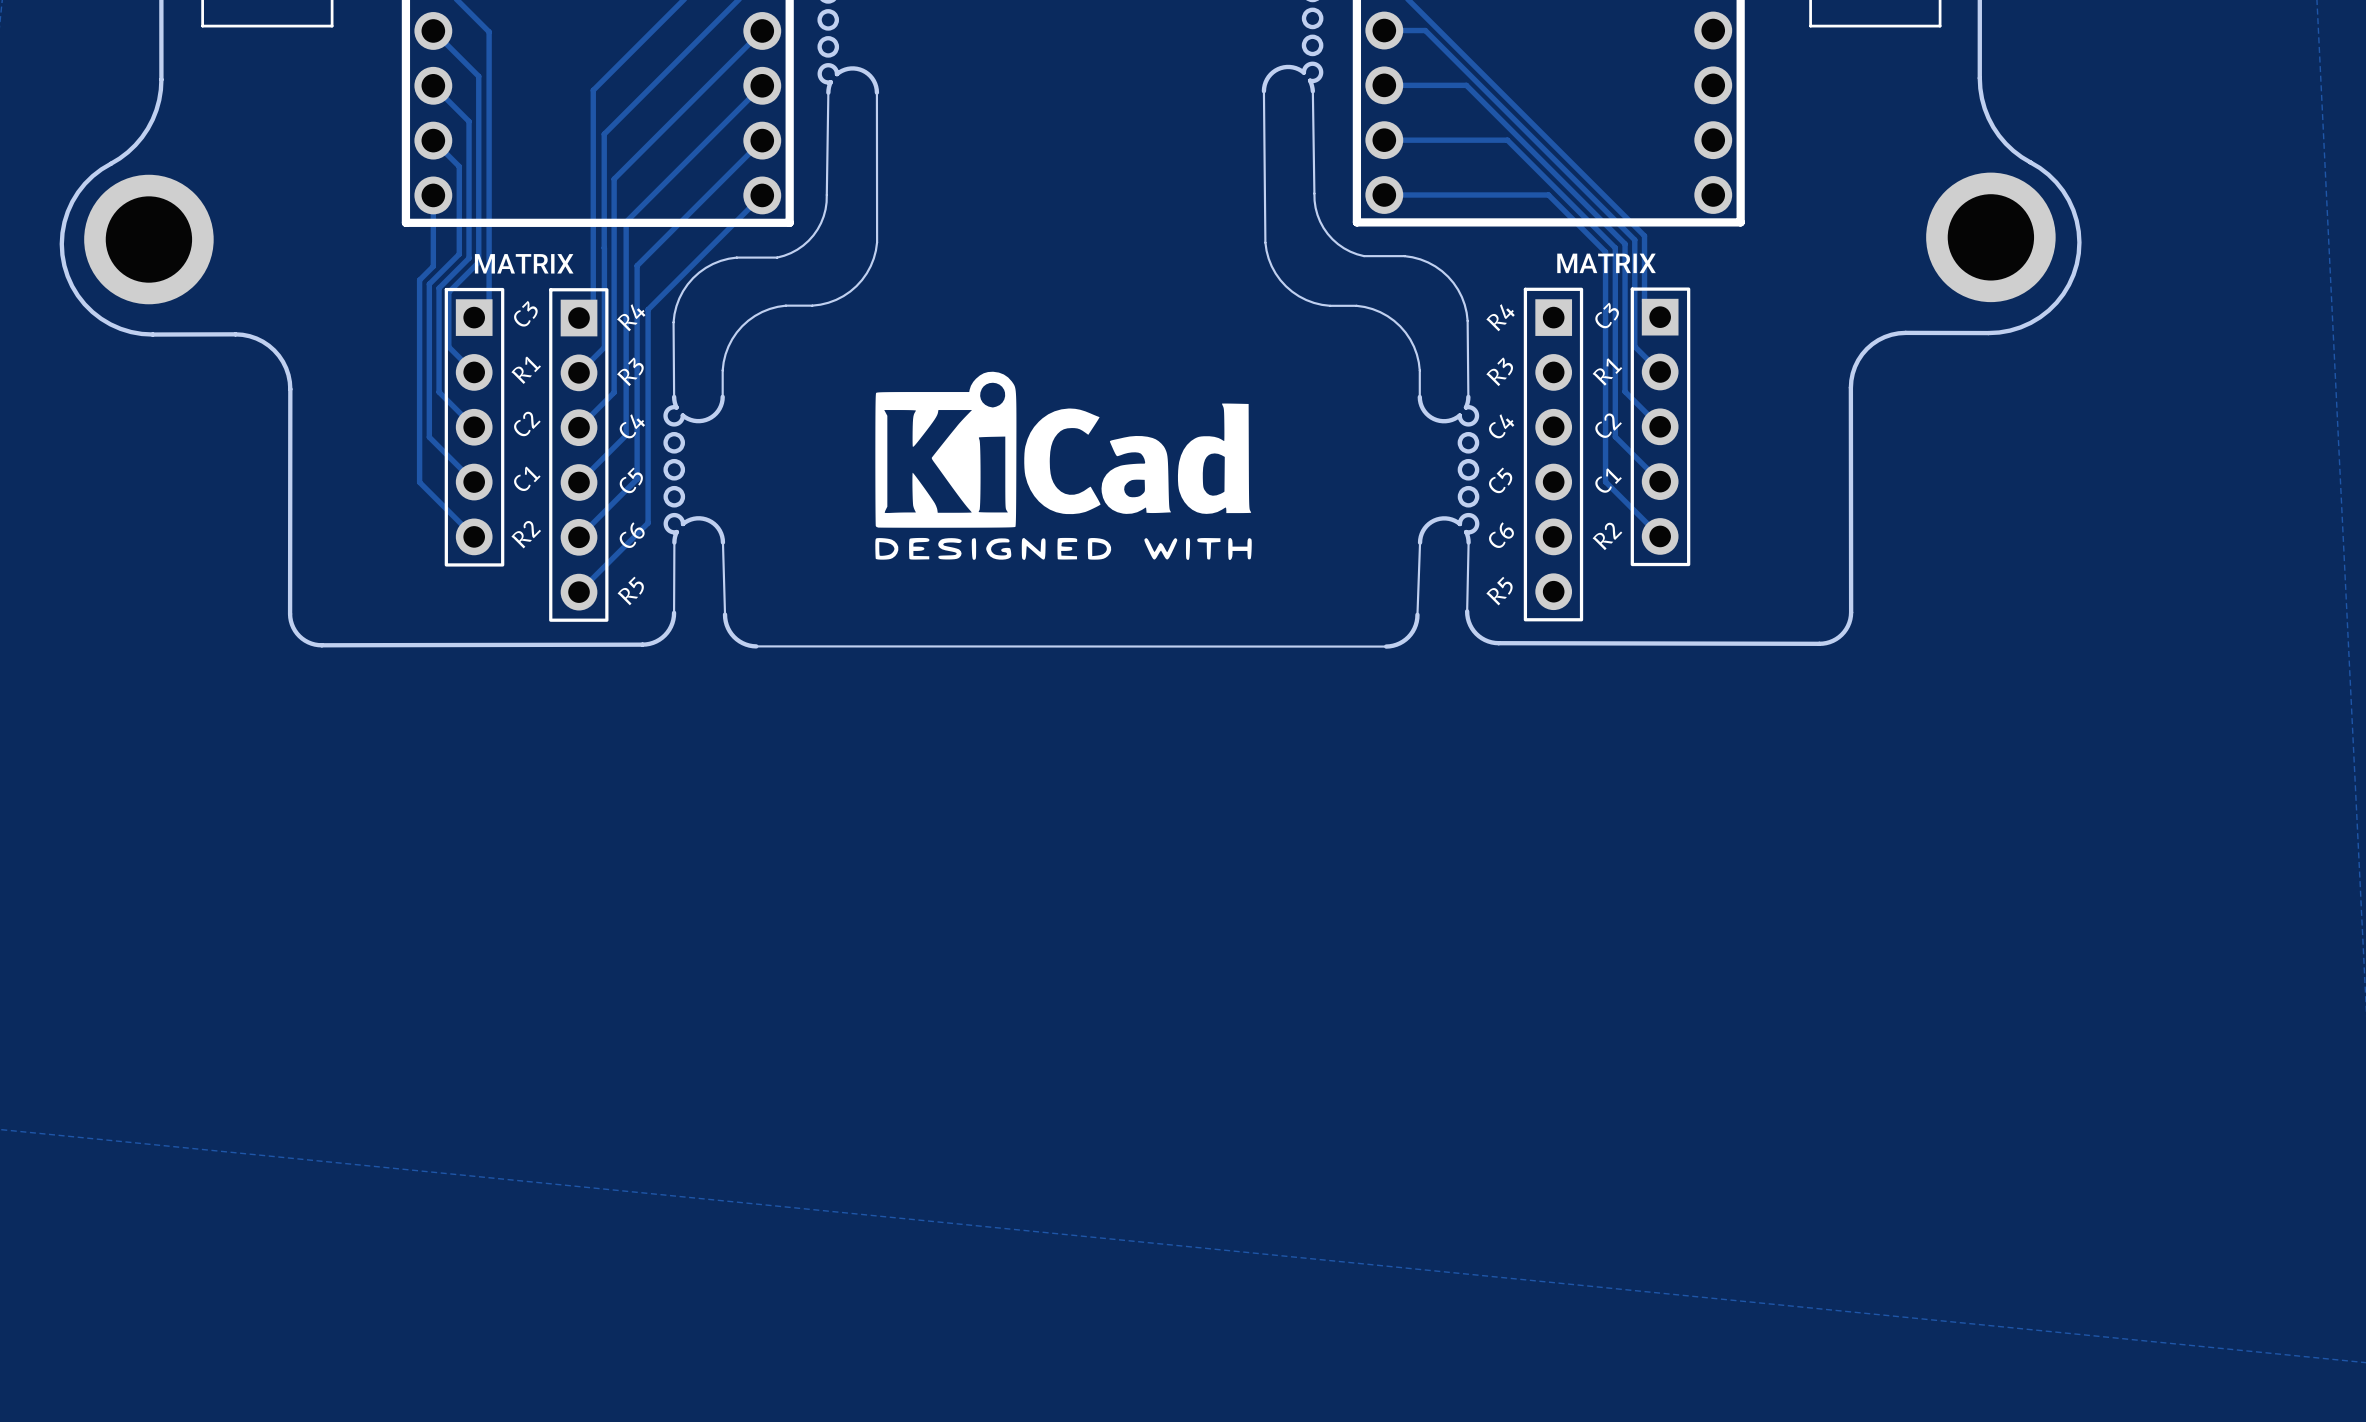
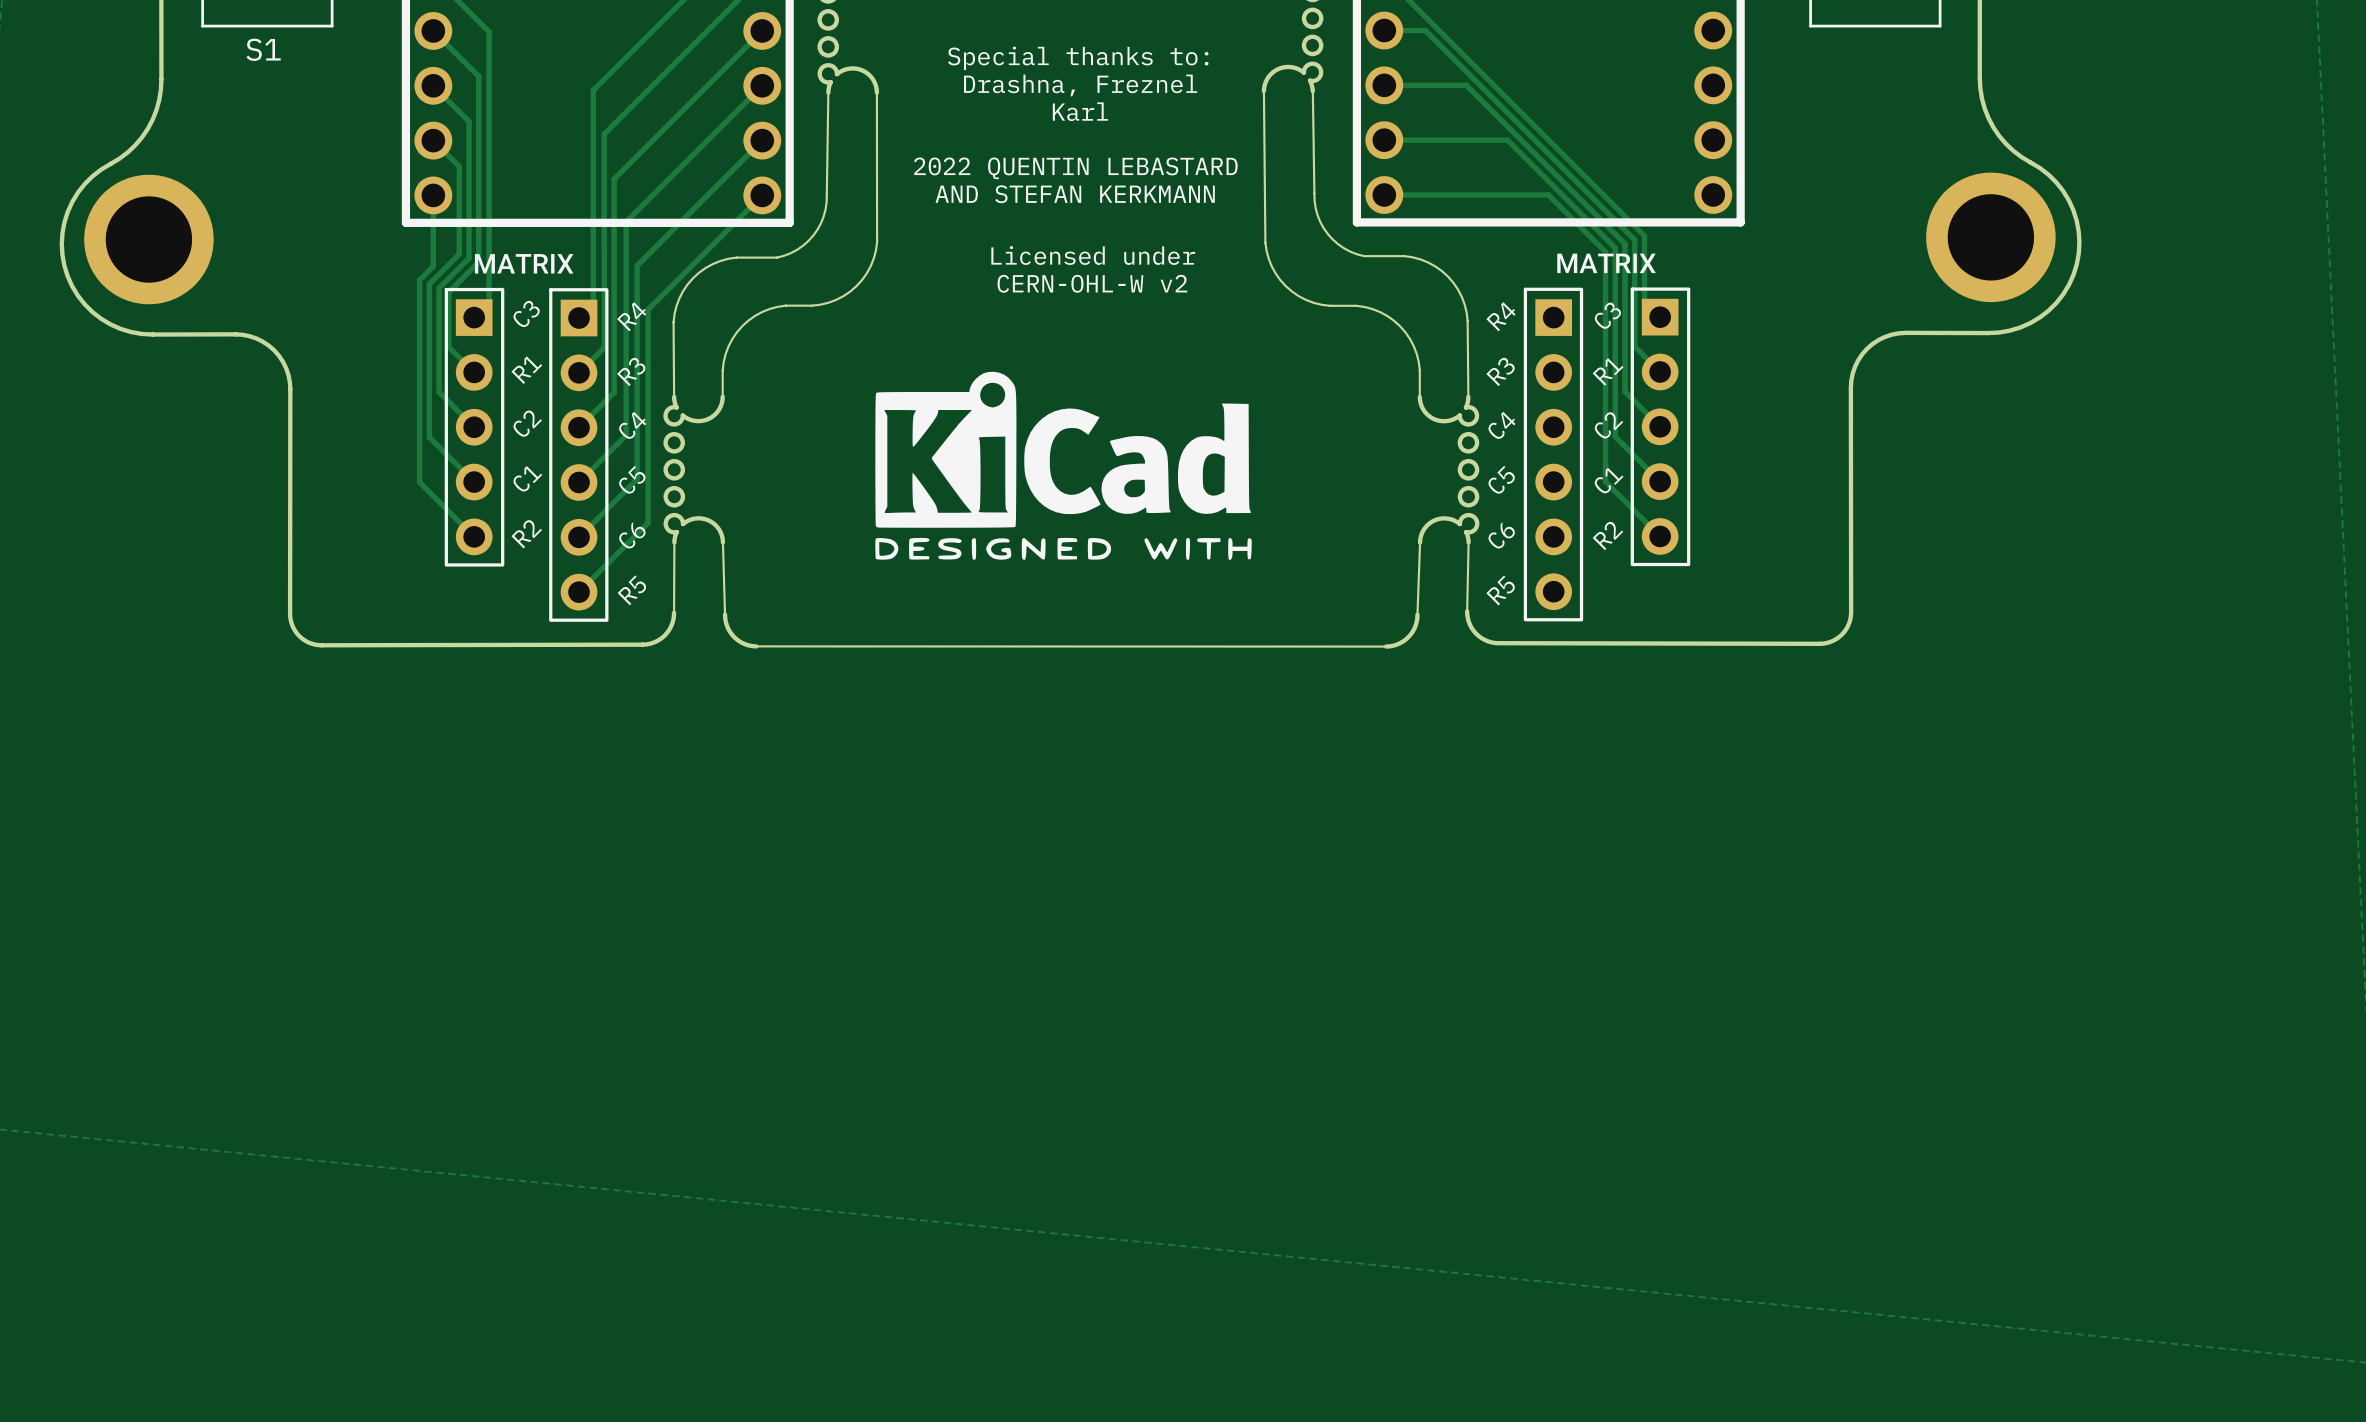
S1 name: none -> S1 (263, 49)
text: none -> Special thanks to: (1078, 58)
text: none -> Drashna, Freznel (1080, 85)
text: none -> Karl (1080, 111)
text: none -> 2022 QUENTIN LEBASTARD (1075, 168)
text: none -> AND STEFAN KERKMANN (1075, 194)
text: none -> Licensed under (1093, 255)
text: none -> CERN-OHL-W v2 (1092, 283)

